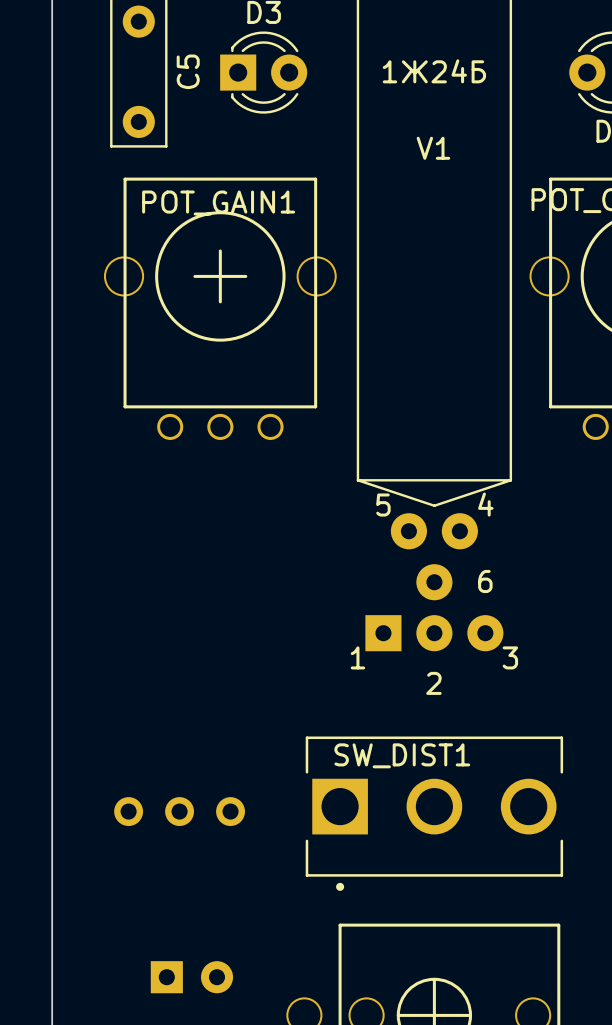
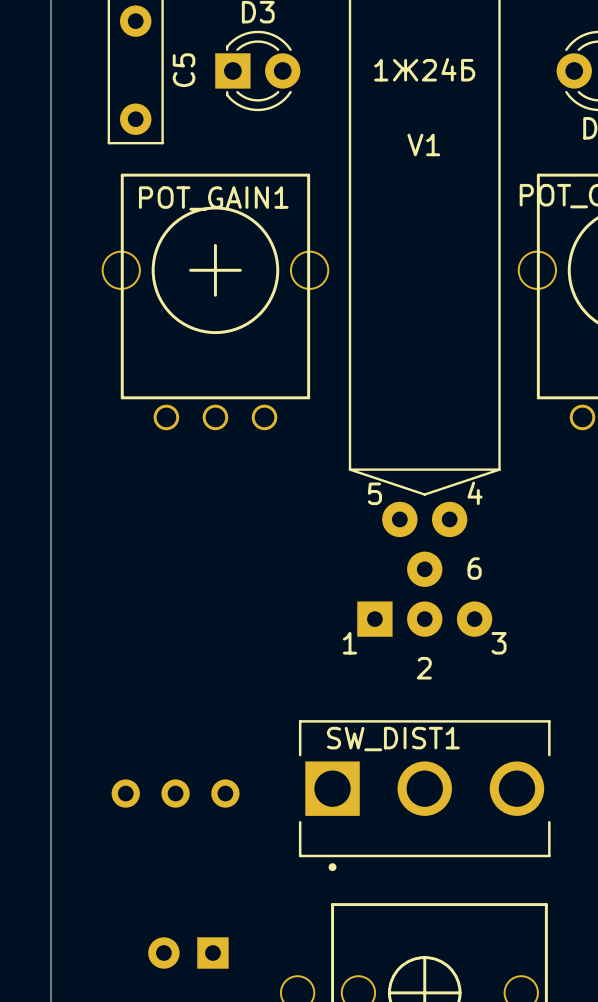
part rotation: 0° (191, 977) -> 180° (188, 953)

